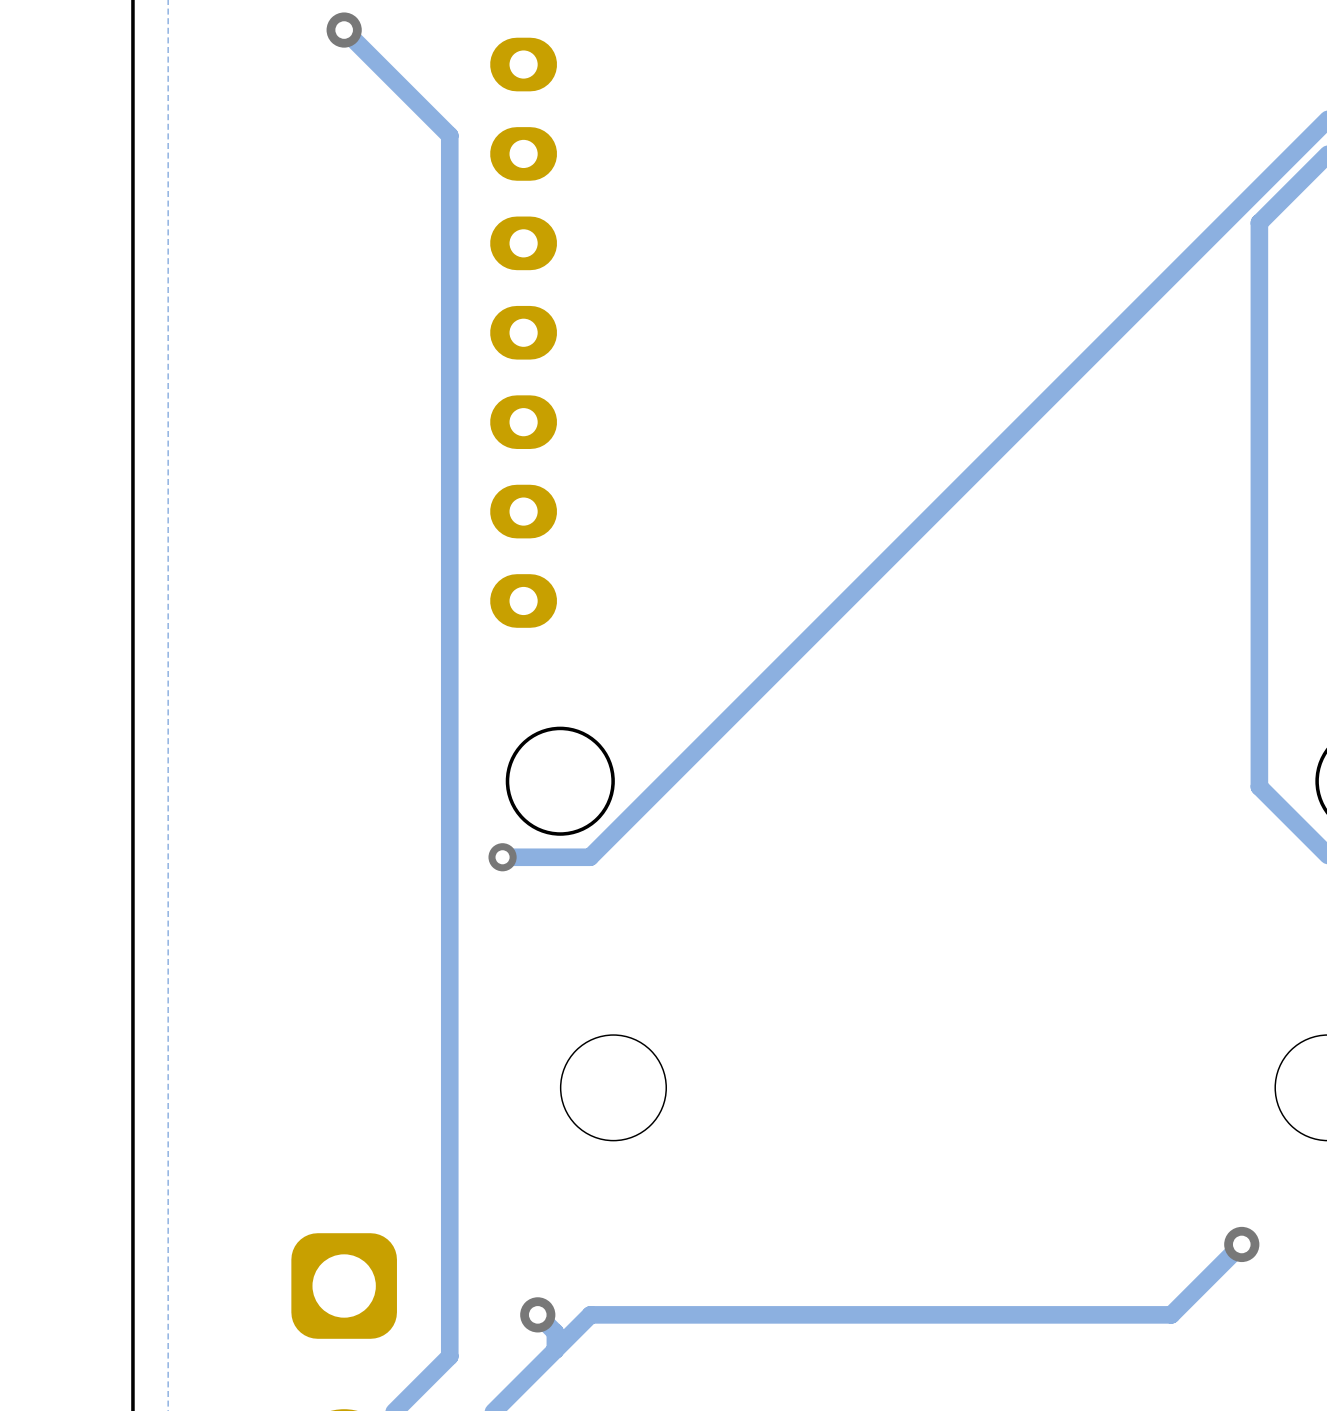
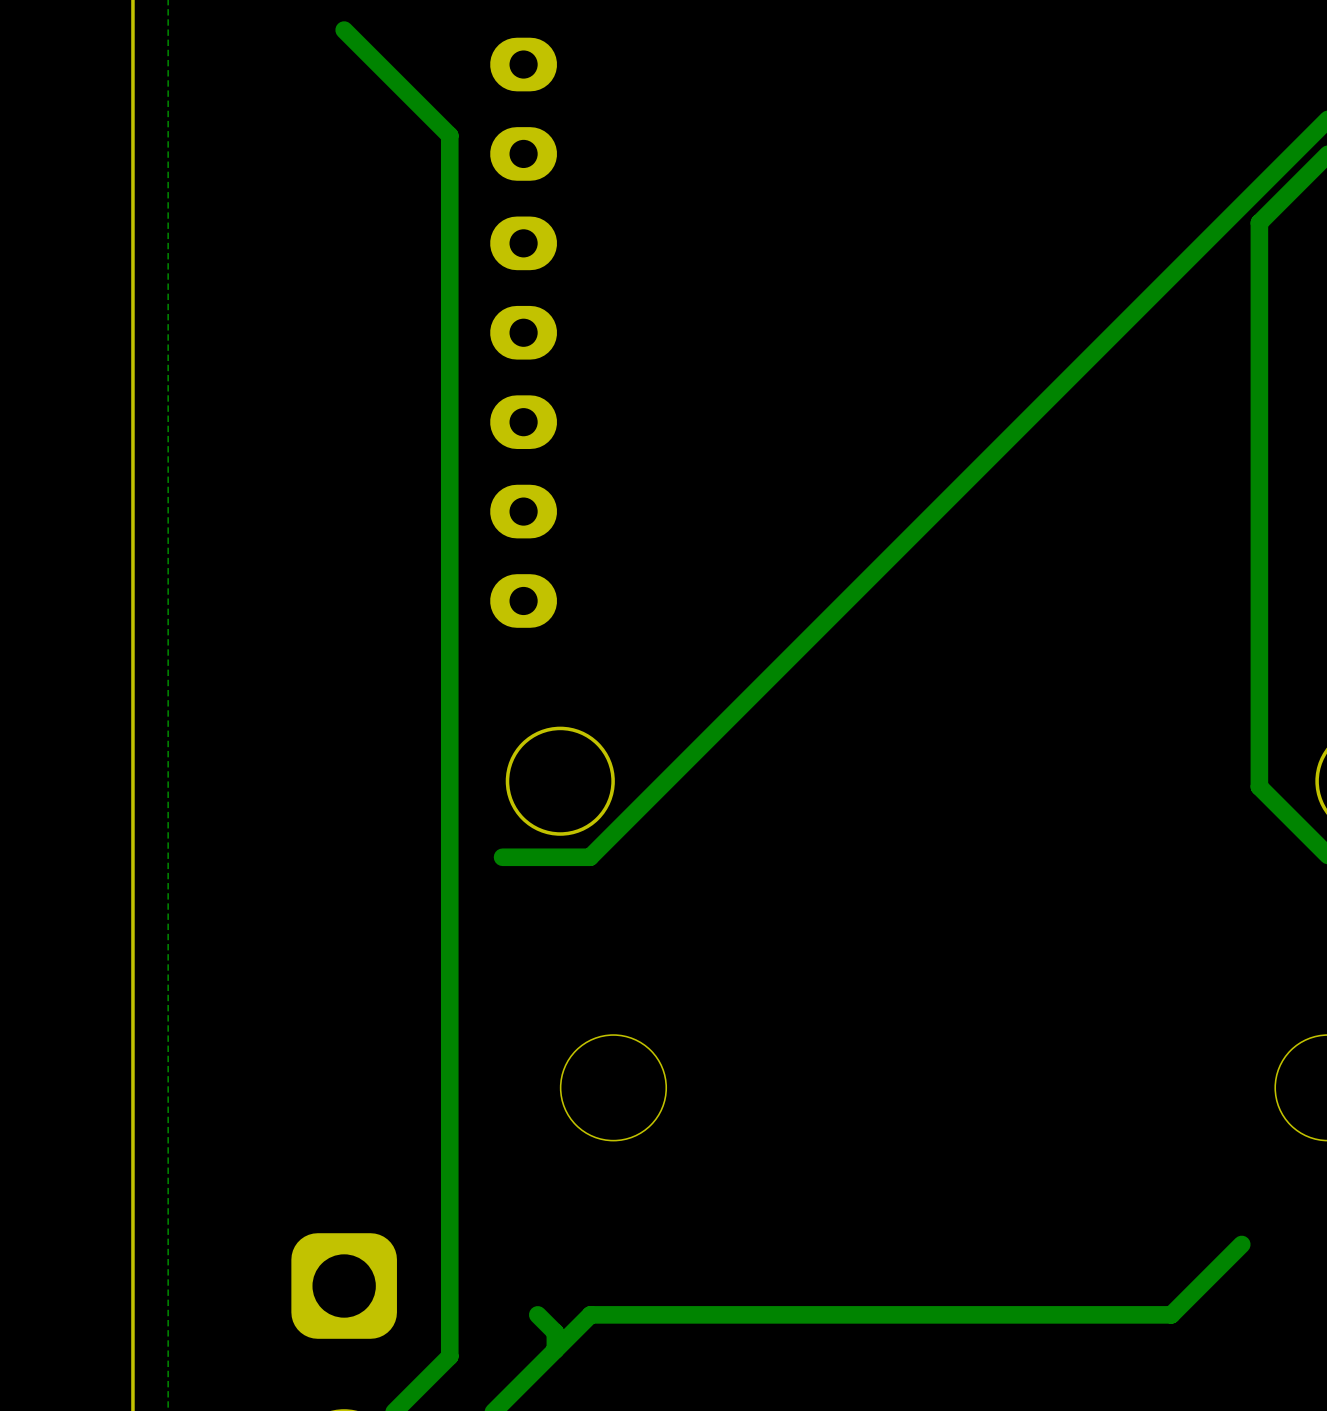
via: (344, 30) -> none
via: (502, 857) -> none
via: (1241, 1244) -> none
via: (537, 1314) -> none

